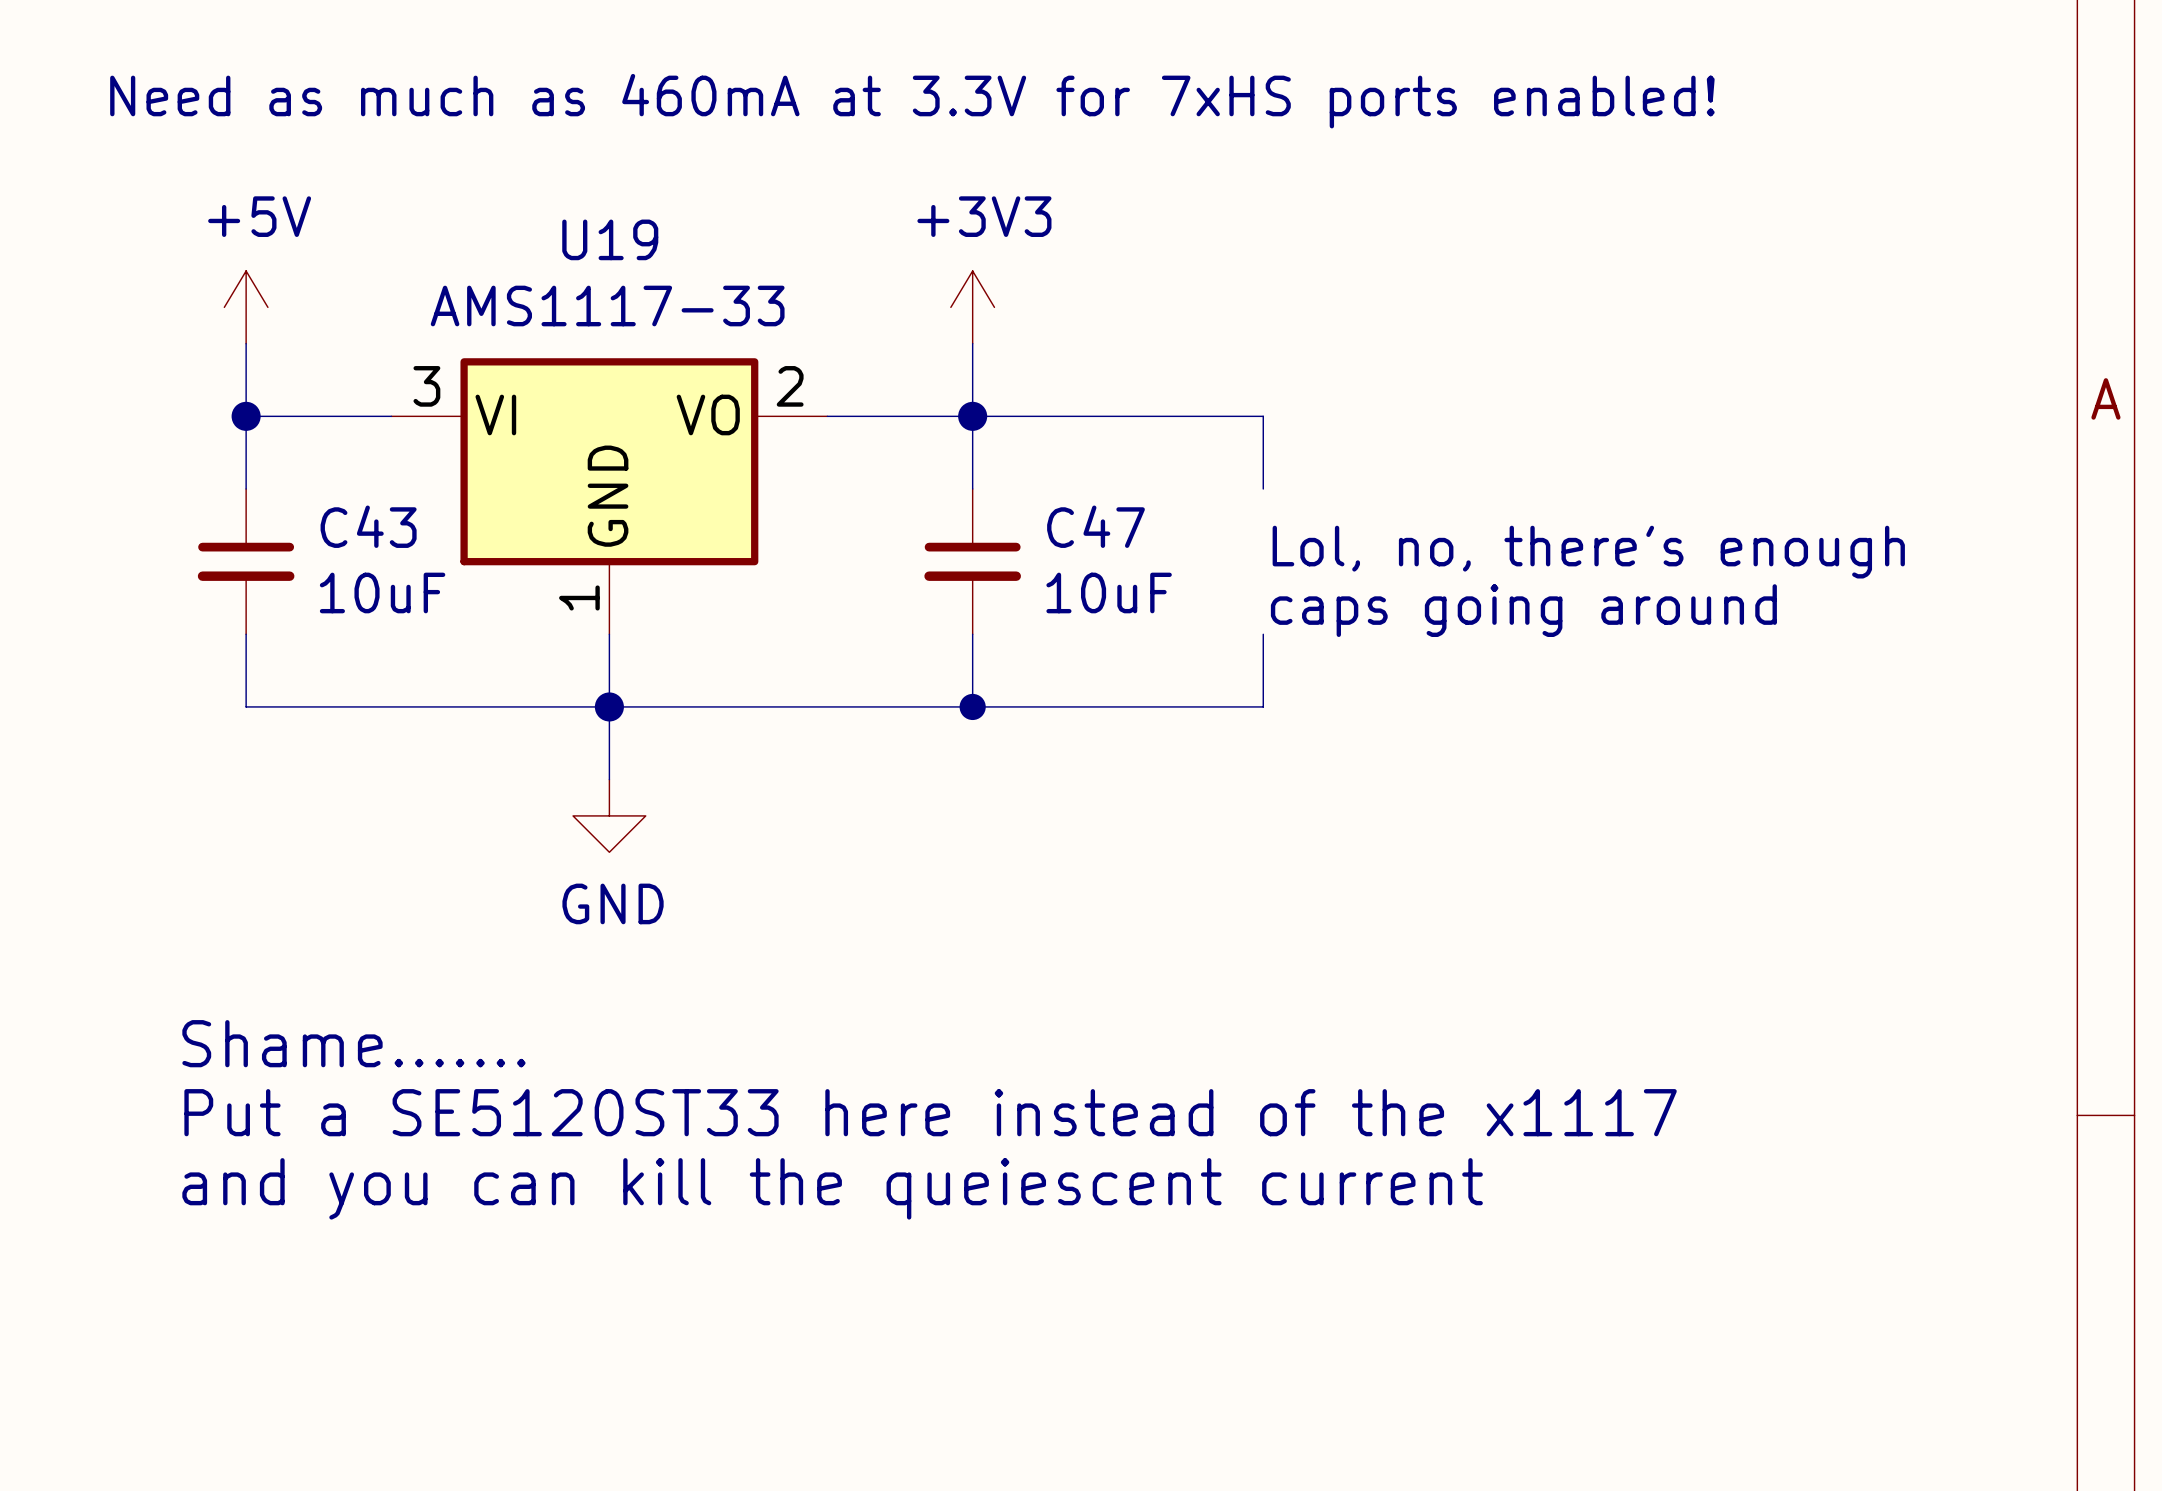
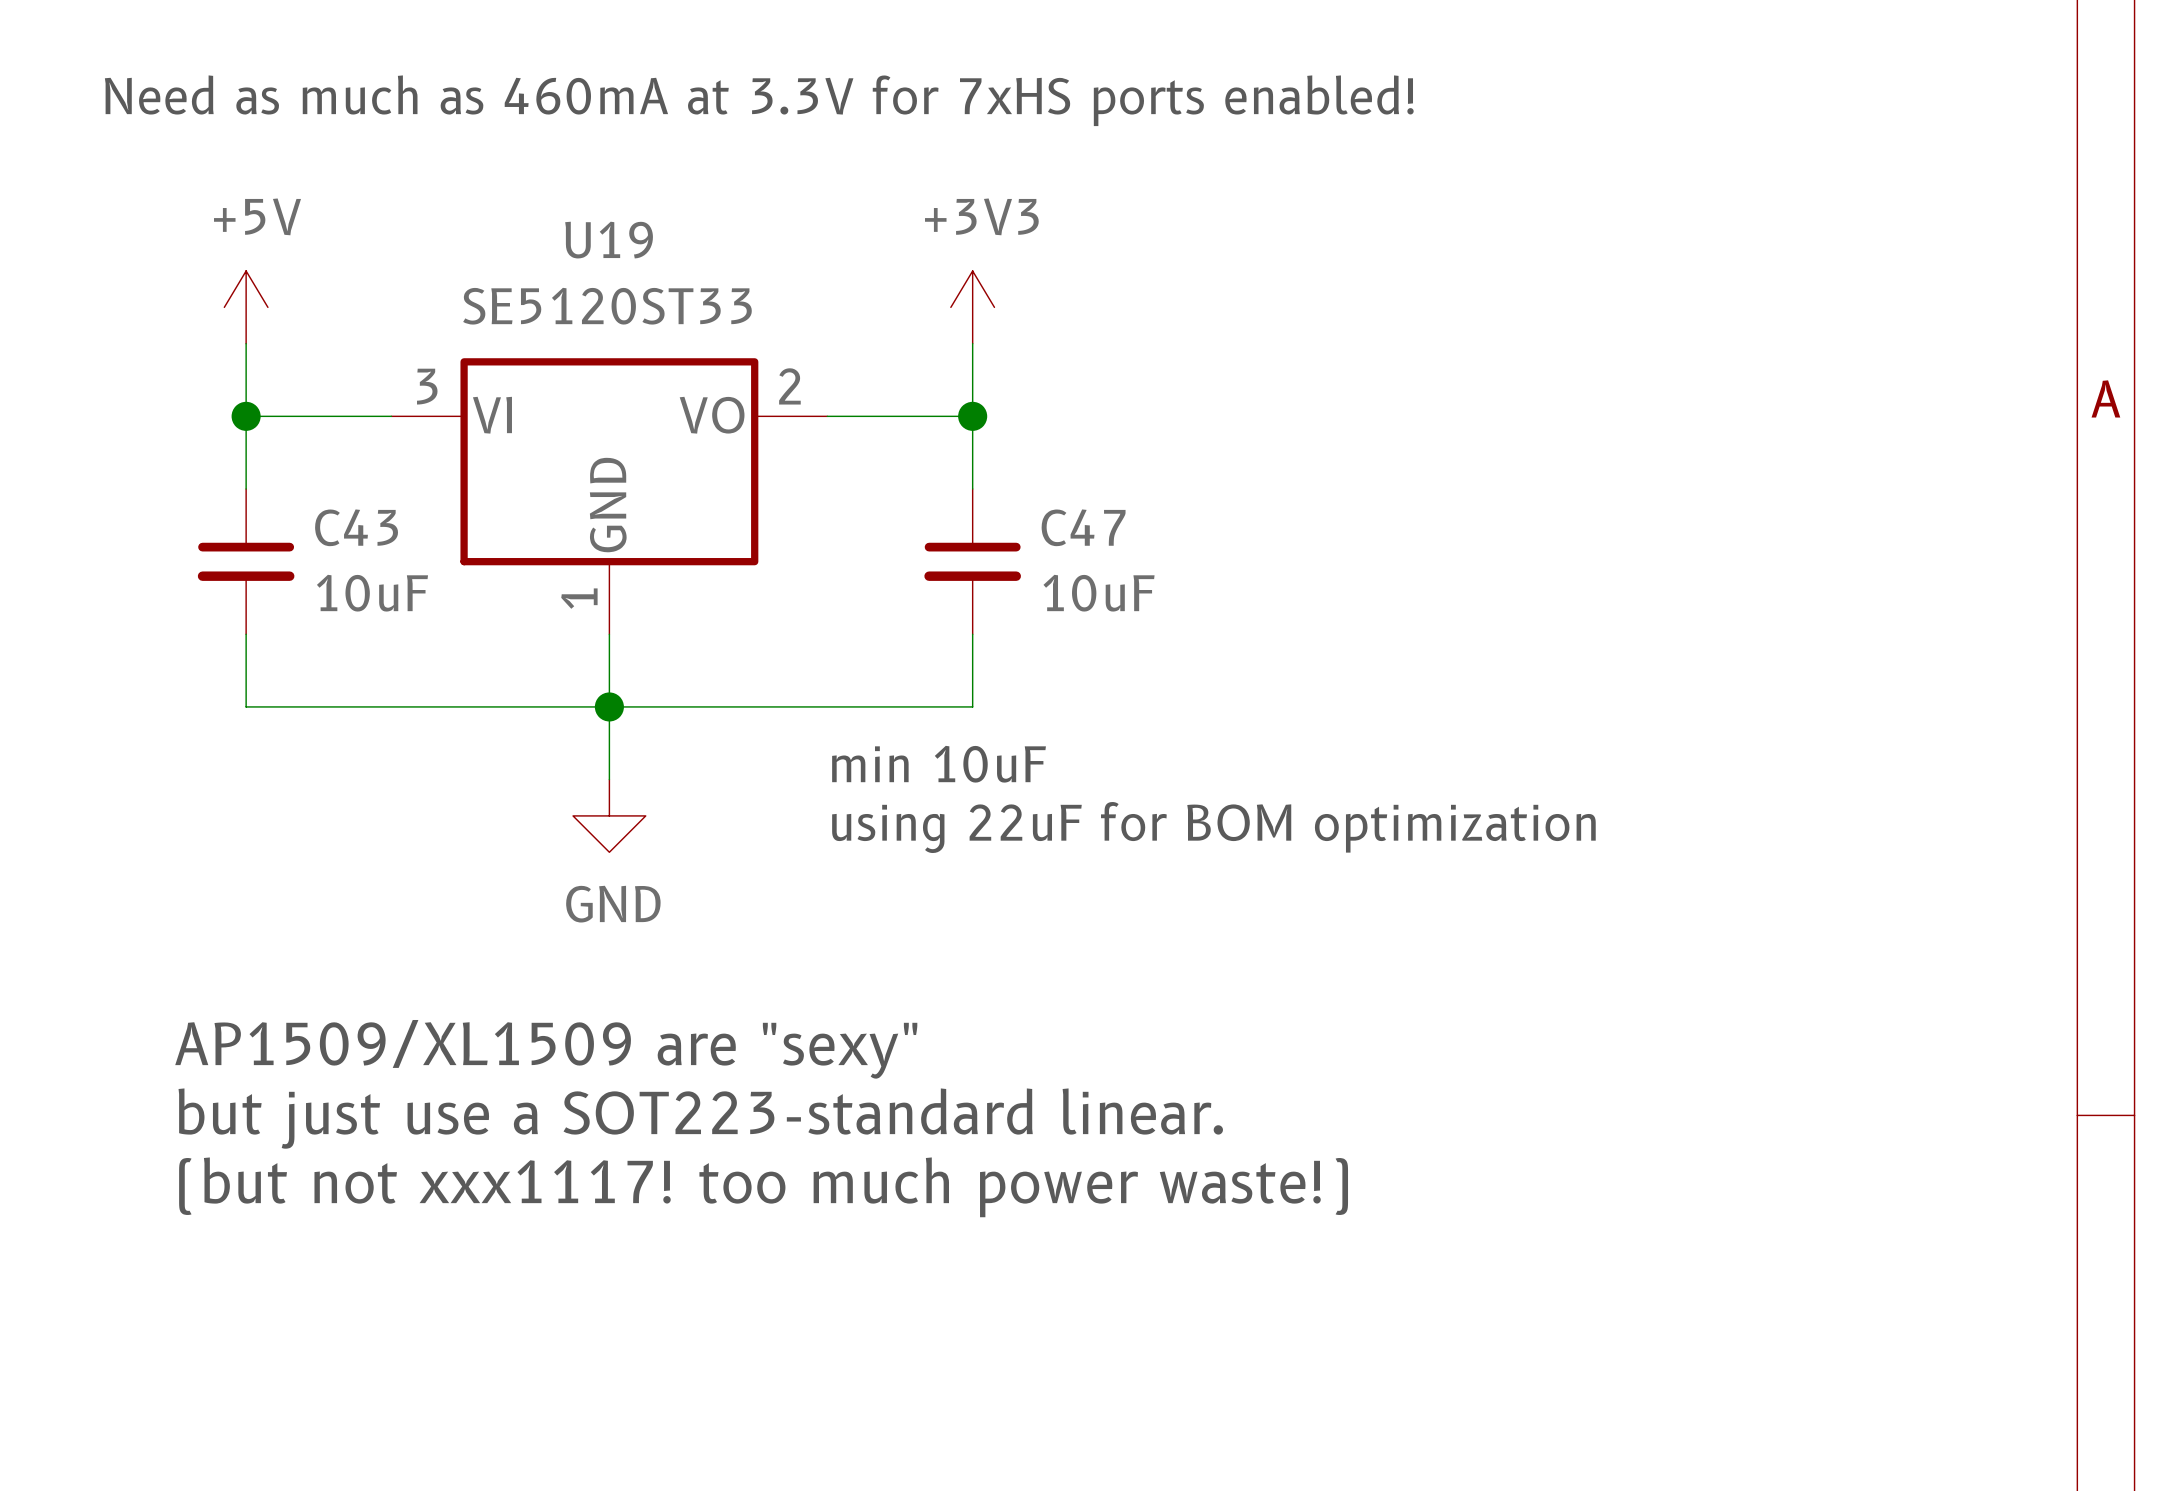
U19 value: AMS1117-33 (607, 306) -> SE5120ST33 (607, 306)
wire: (972, 416) (1263, 416) (1263, 488) -> none
text: Lol, no, there's enough (1588, 552) -> none
text: caps going around (1523, 610) -> none
wire: (1263, 634) (1263, 706) (972, 706) -> none
junction: (972, 706) -> none
text: none -> min 10uF (939, 764)
text: none -> using 22uF for BOM optimization (1213, 827)
text: Shame....... (353, 1043) -> AP1509/XL1509 are "sexy" (546, 1049)
text: Put a SE5120ST33 here instead of the x1117 (930, 1112) -> but just use a SOT223-standard linear. (700, 1118)
text: and you can kill the queiescent current (832, 1188) -> (but not xxx1117! too much power waste!) (763, 1187)

